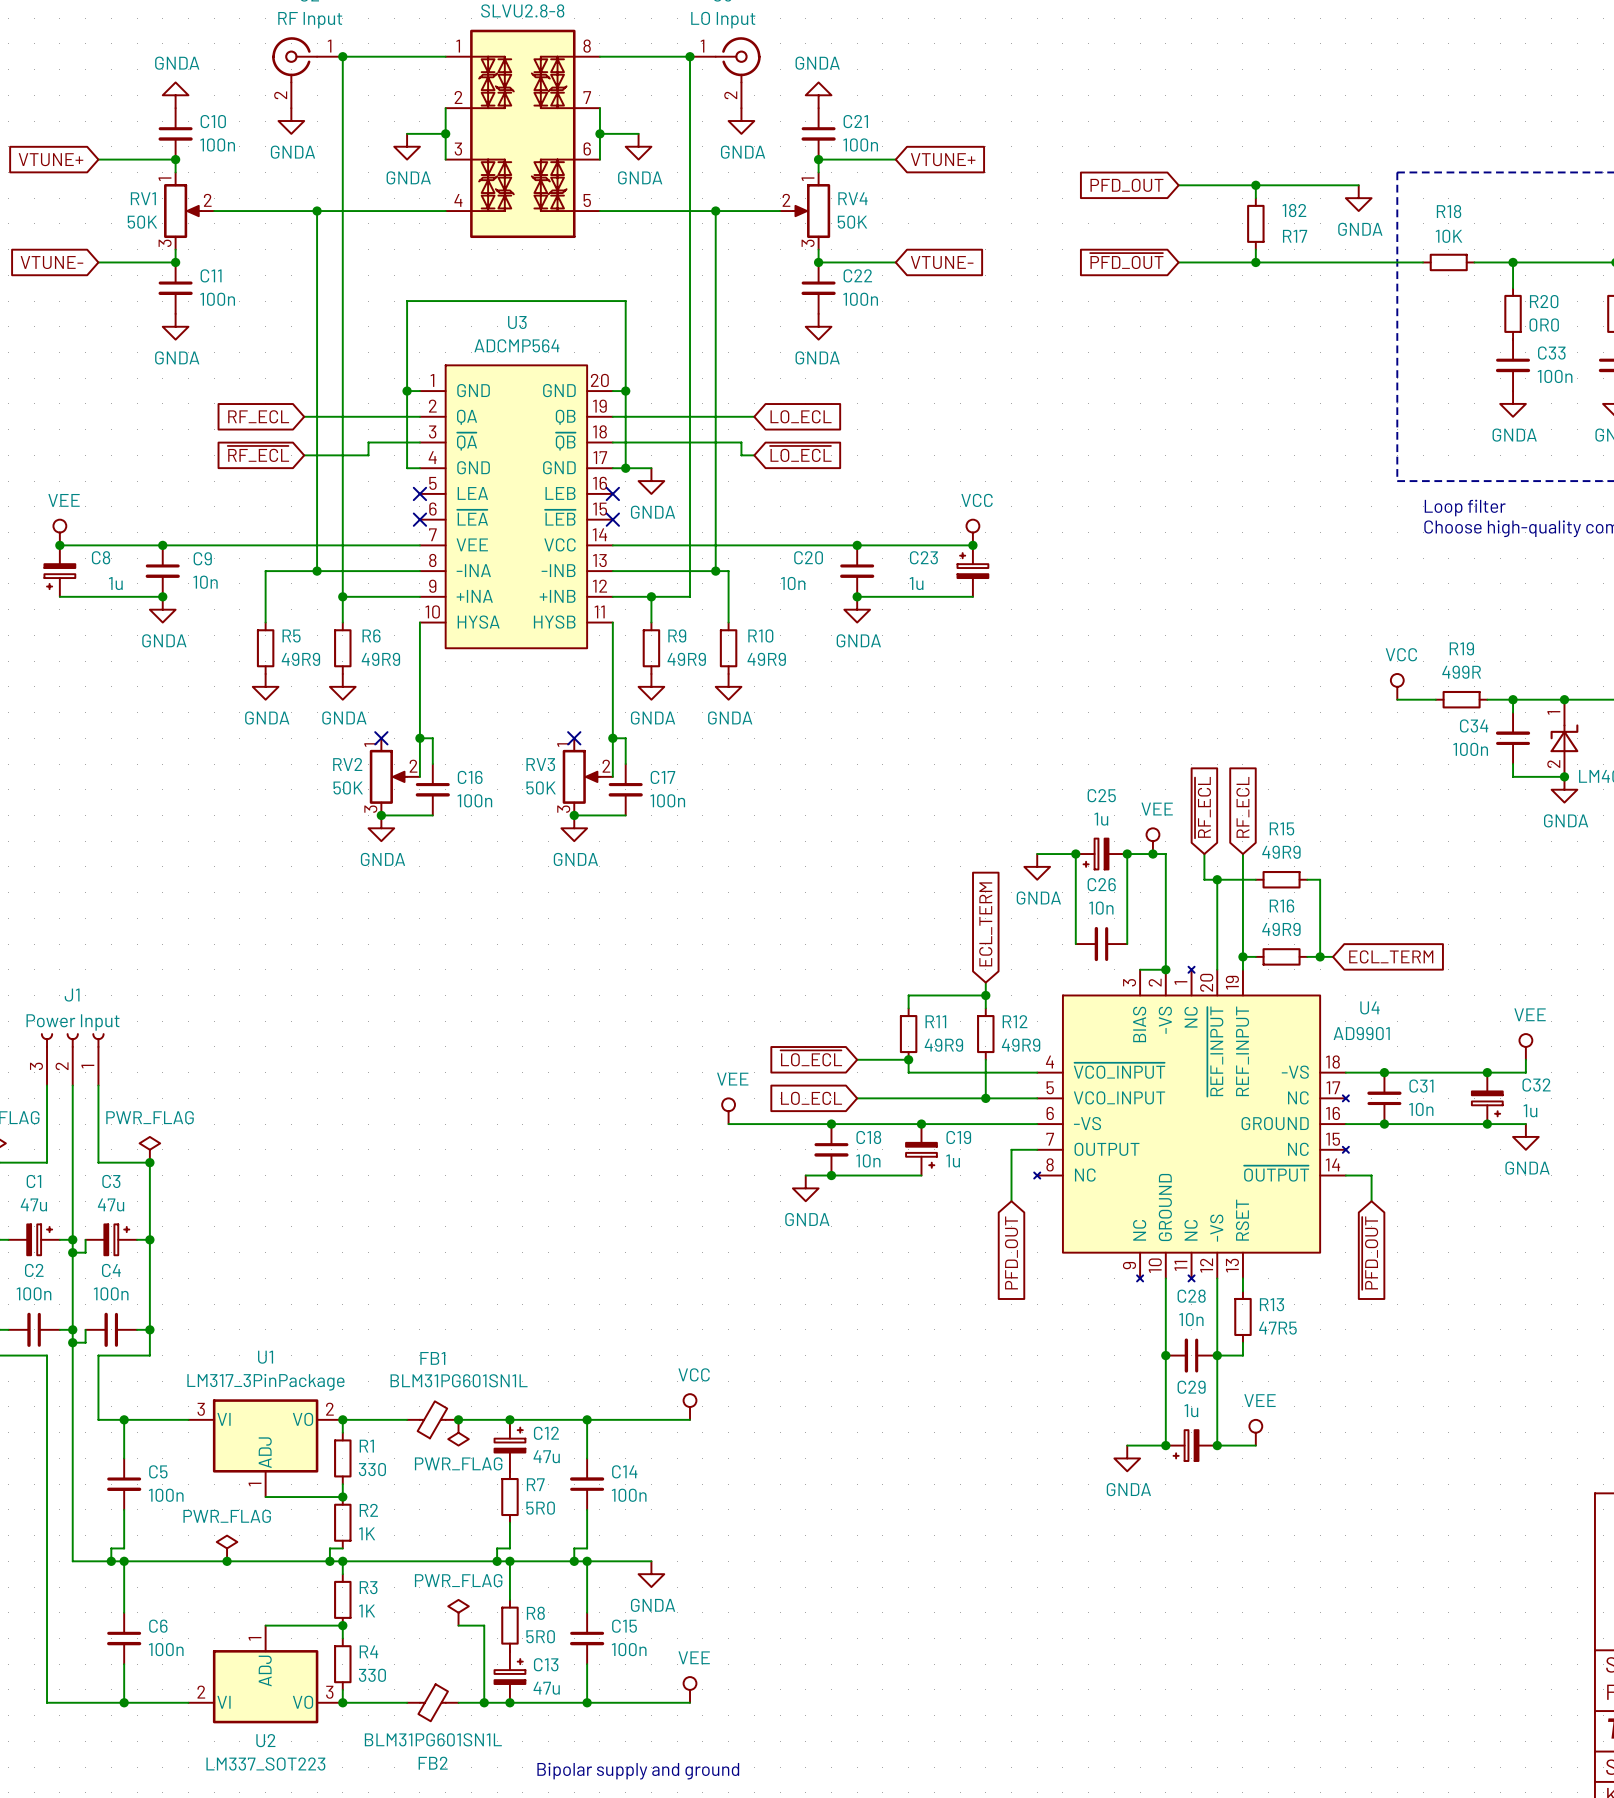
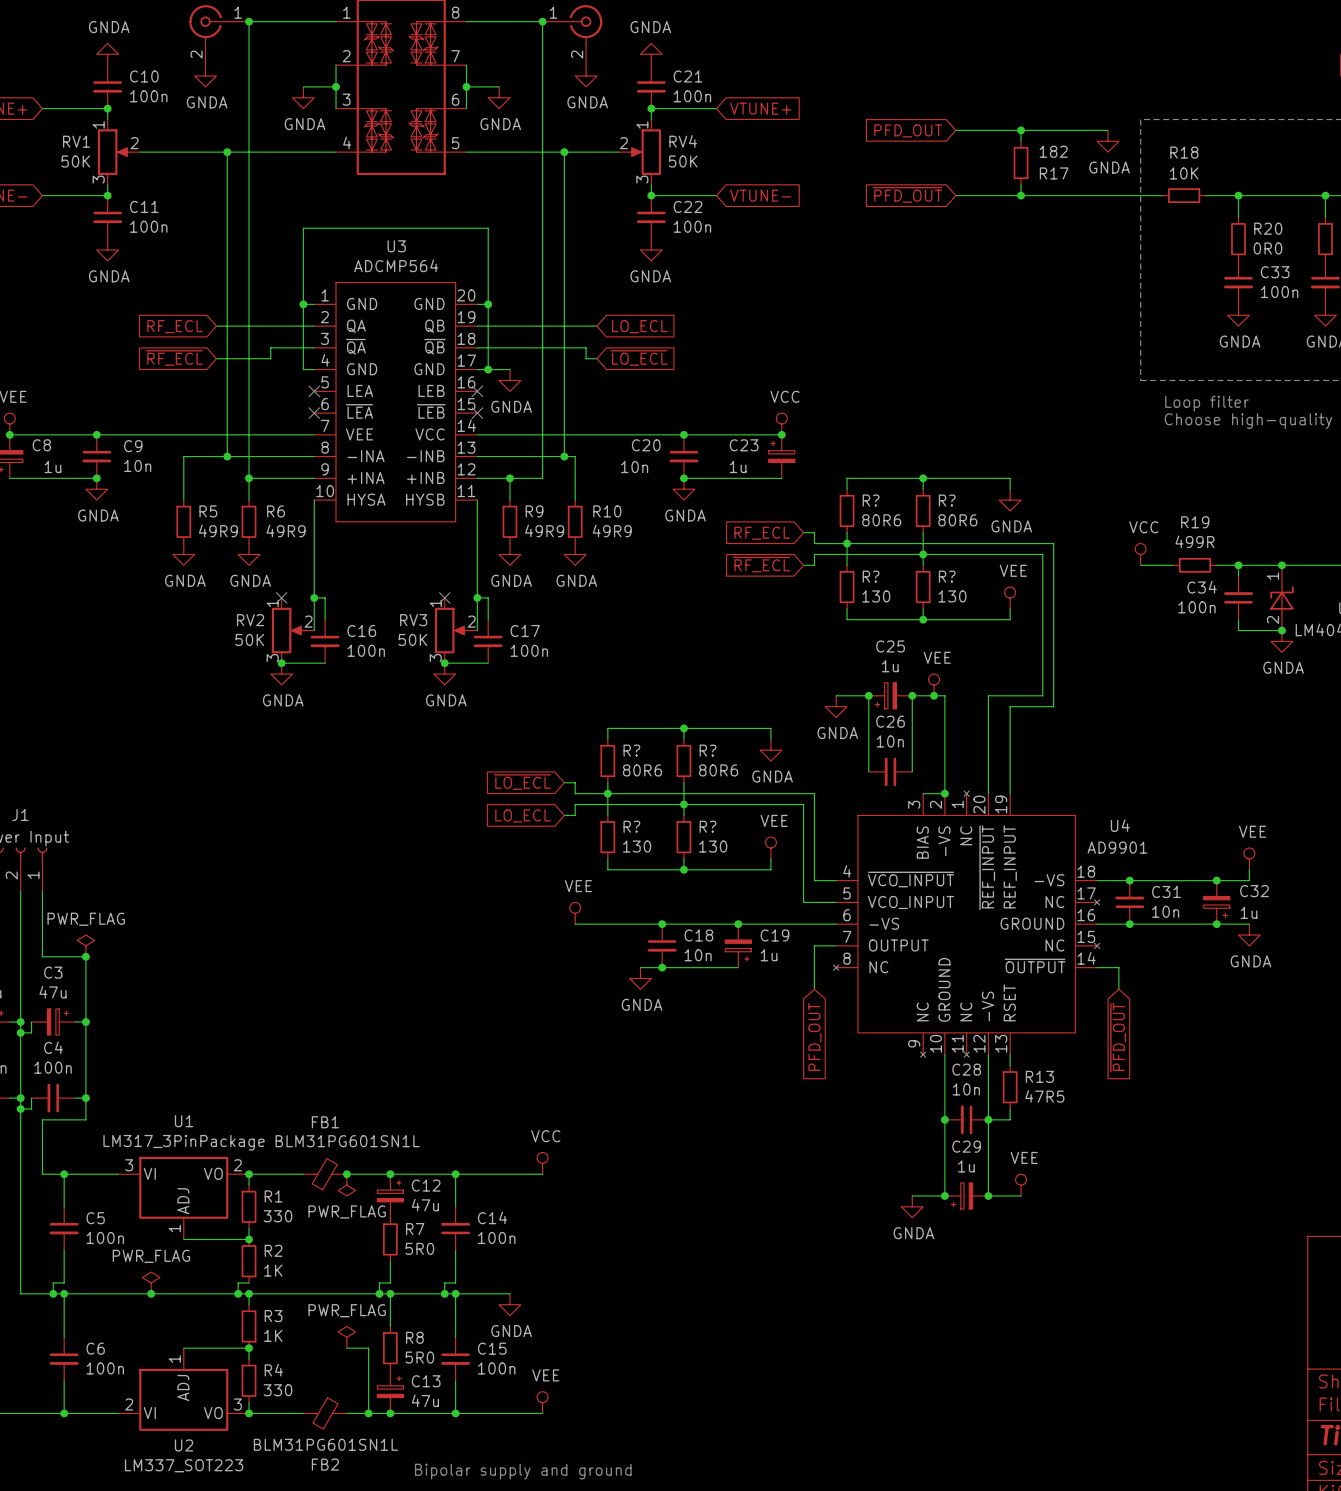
wire: none -> (923, 478) (923, 489)
junction: none -> (923, 478)
wire: none -> (847, 489) (847, 478) (1010, 478) (1010, 489)
power symbol: none -> GNDA (1010, 500)
R?: none -> 80R6 (847, 510)
R?: none -> 80R6 (923, 510)
global label: none -> RF_ECL (762, 533)
wire: none -> (847, 532) (847, 565)
wire: none -> (923, 532) (923, 565)
junction: none -> (847, 543)
junction: none -> (923, 554)
global label: none -> ~{RF_ECL} (761, 564)
wire: none -> (803, 565) (814, 565) (814, 554) (1042, 554) (1042, 695) (988, 695) (988, 717)
R?: none -> 130 (847, 587)
R?: none -> 130 (923, 587)
power symbol: none -> VEE (1010, 597)
wire: none -> (847, 608) (847, 619) (1010, 619) (1010, 608)
wire: none -> (923, 608) (923, 619)
junction: none -> (923, 619)
global label: ~{RF_ECL} (1203, 807) -> none
global label: RF_ECL (1242, 807) -> none
wire: (1204, 854) (1204, 879) (1255, 879) -> none
wire: (1242, 854) (1242, 866) -> (803, 532) (814, 532) (814, 543) (1053, 543) (1053, 706) (1010, 706)
junction: (1217, 879) -> none
R15: 49R9 (1281, 879) -> none
wire: (1307, 879) (1320, 879) (1320, 956) -> none
wire: none -> (683, 728) (683, 739)
junction: none -> (683, 728)
wire: none -> (607, 739) (607, 728) (770, 728) (770, 739)
power symbol: none -> GNDA (770, 750)
global label: ECL_TERM (985, 924) -> none
R?: none -> 80R6 (607, 761)
R?: none -> 80R6 (683, 761)
wire: none -> (564, 782) (575, 782) (575, 793) (814, 793) (814, 880)
wire: none -> (607, 782) (607, 815)
wire: (1242, 956) (1255, 956) -> none
junction: (1242, 956) -> none
R16: 49R9 (1281, 956) -> none
wire: (1307, 956) (1333, 956) -> none
junction: (1320, 956) -> none
global label: ECL_TERM (1391, 956) -> none
junction: none -> (607, 793)
junction: none -> (683, 804)
wire: (985, 982) (985, 1008) -> none
wire: (985, 995) (908, 995) (908, 1008) -> none
junction: (985, 995) -> none
R?: none -> 130 (607, 837)
R?: none -> 130 (683, 837)
R11: 49R9 (908, 1034) -> none
power symbol: none -> VEE (770, 848)
R12: 49R9 (985, 1034) -> none
wire: none -> (607, 858) (607, 869) (683, 869) (683, 858)
global label position: ~{LO_ECL} (811, 1058) -> ~{LO_ECL} (522, 782)
junction: none -> (683, 869)
wire: (908, 1059) (908, 1072) (1011, 1072) -> (727, 869) (770, 869) (770, 858)
junction: (908, 1059) -> none
wire: (985, 1059) (985, 1098) -> (683, 782) (683, 815)
global label position: LO_ECL (811, 1098) -> LO_ECL (523, 815)
wire: (857, 1098) (998, 1098) -> (564, 815) (575, 815) (575, 804) (803, 804) (803, 902)
junction: (985, 1098) -> none

